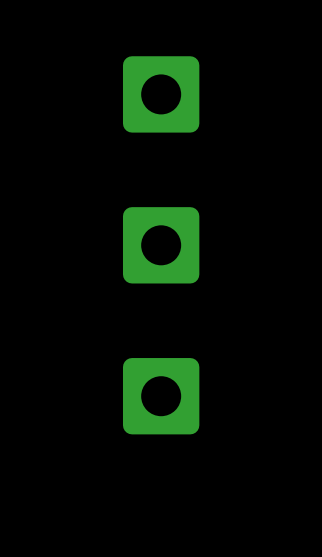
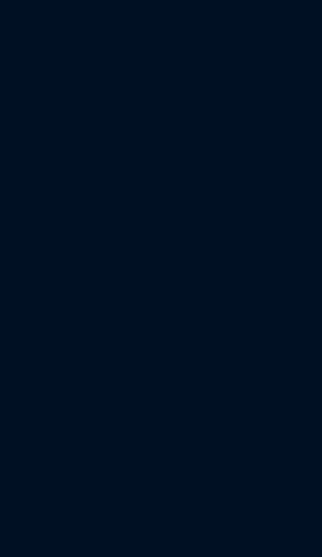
part: (161, 94) -> none
part: (161, 245) -> none
part: (161, 396) -> none

